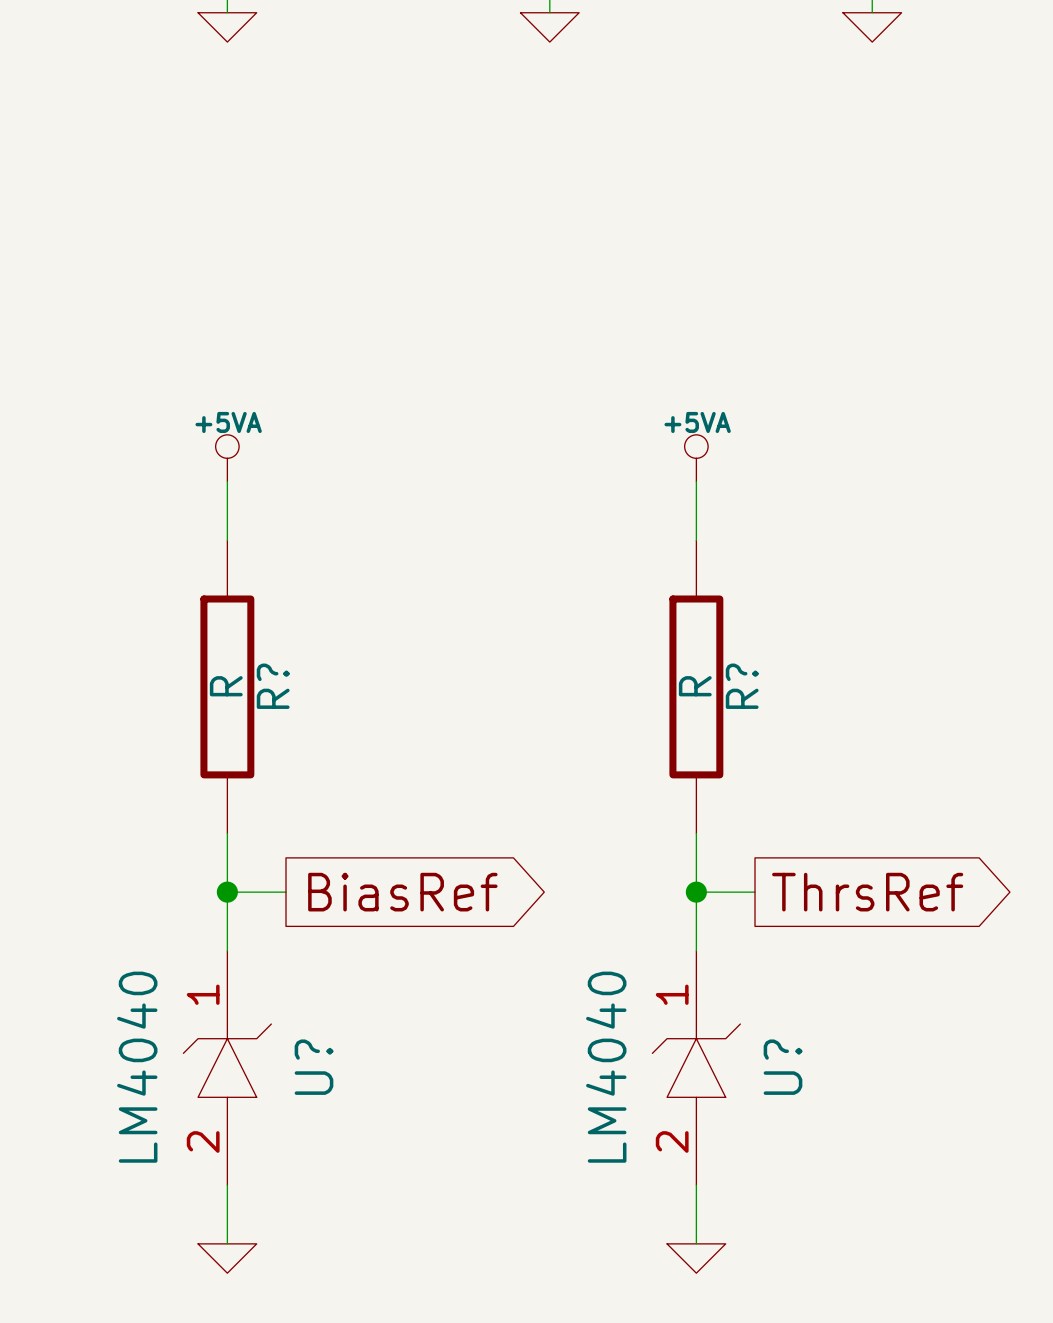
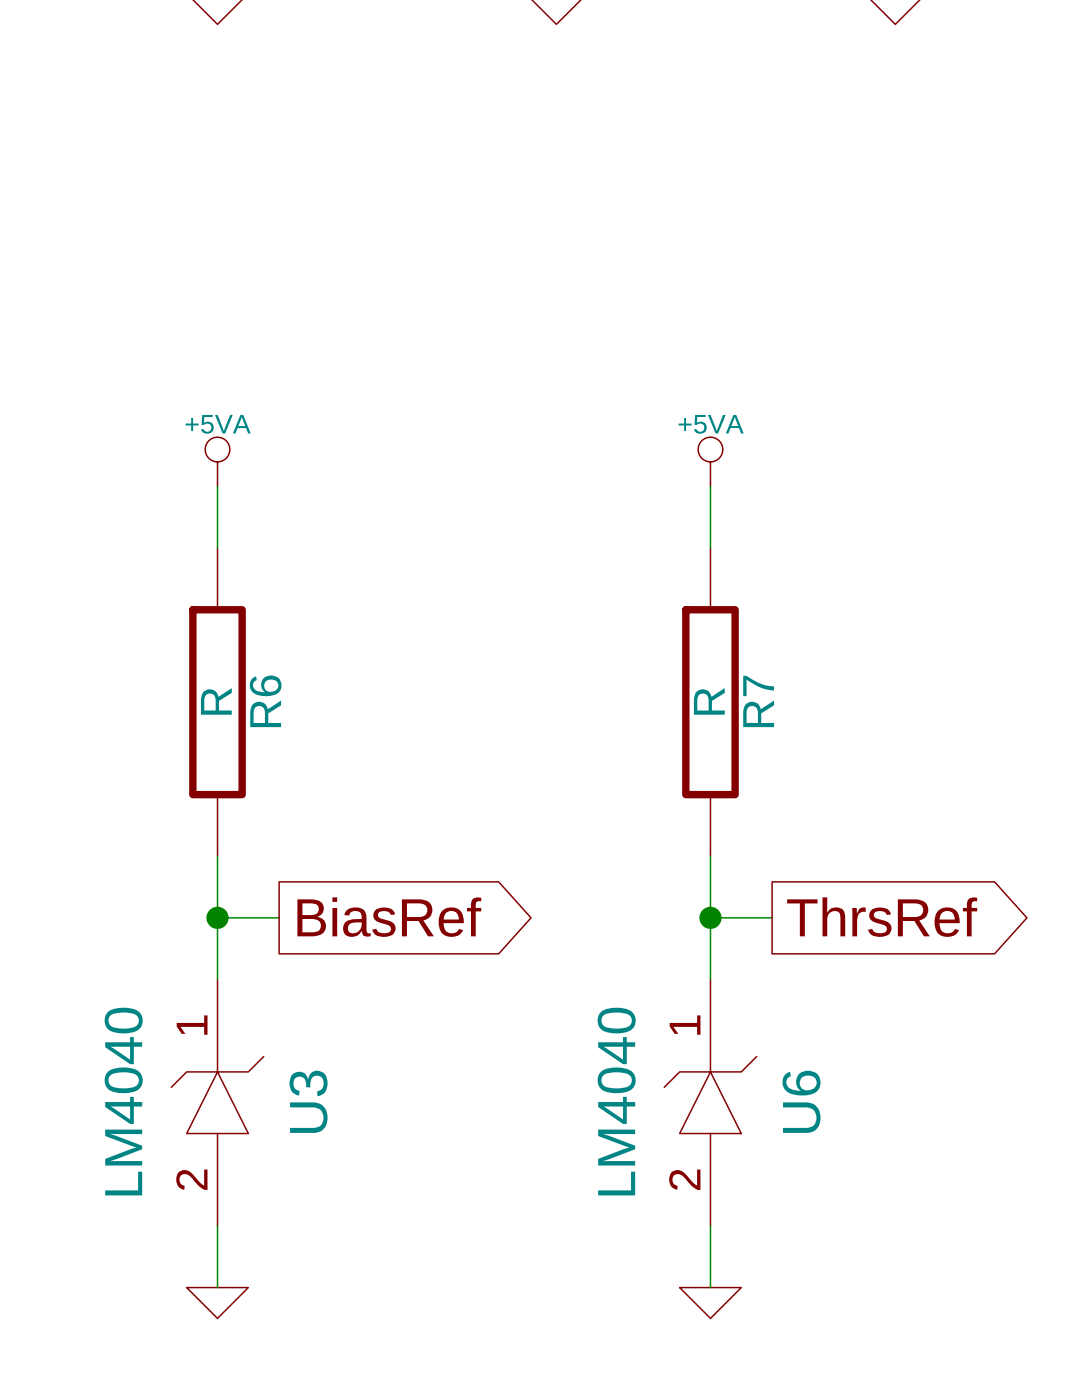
R? name: R? (273, 686) -> R6 (265, 701)
R? name: R? (742, 686) -> R7 (758, 701)
U? name: U? (314, 1067) -> U3 (308, 1101)
U? name: U? (783, 1067) -> U6 (801, 1101)

